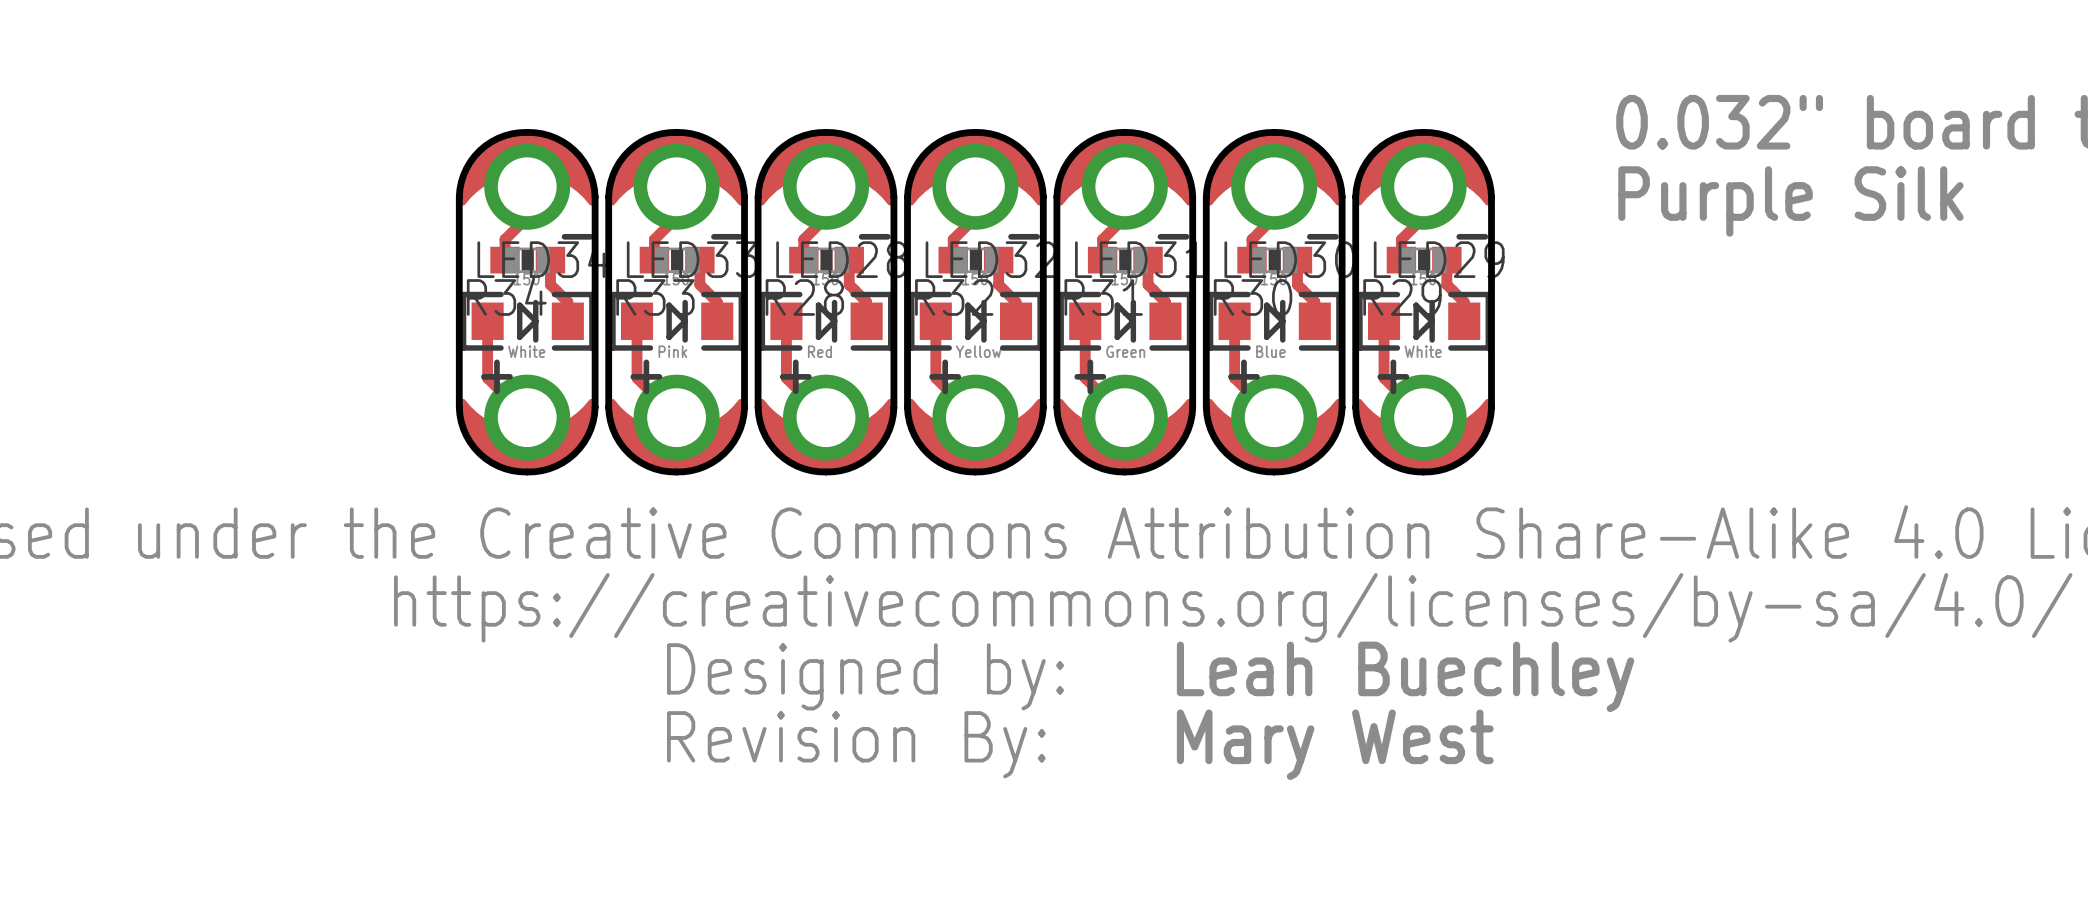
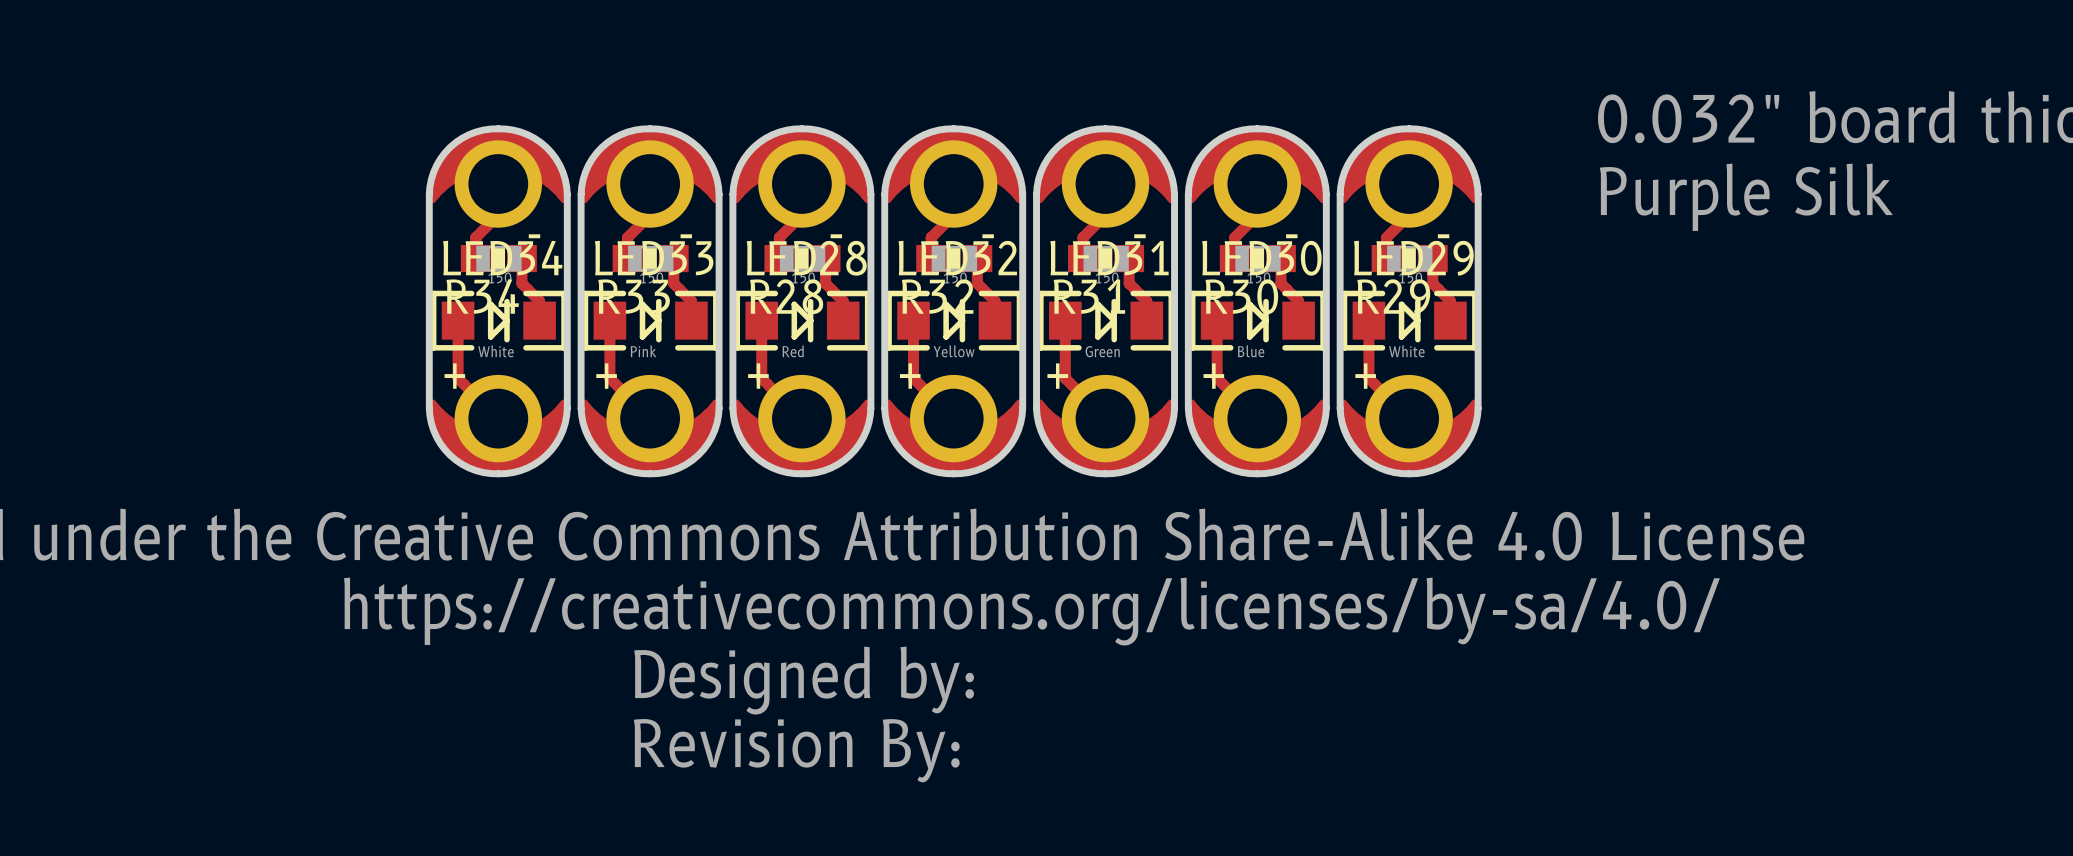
text: Leah Buechley (1405, 676) -> none
text: Mary West (1335, 744) -> none

